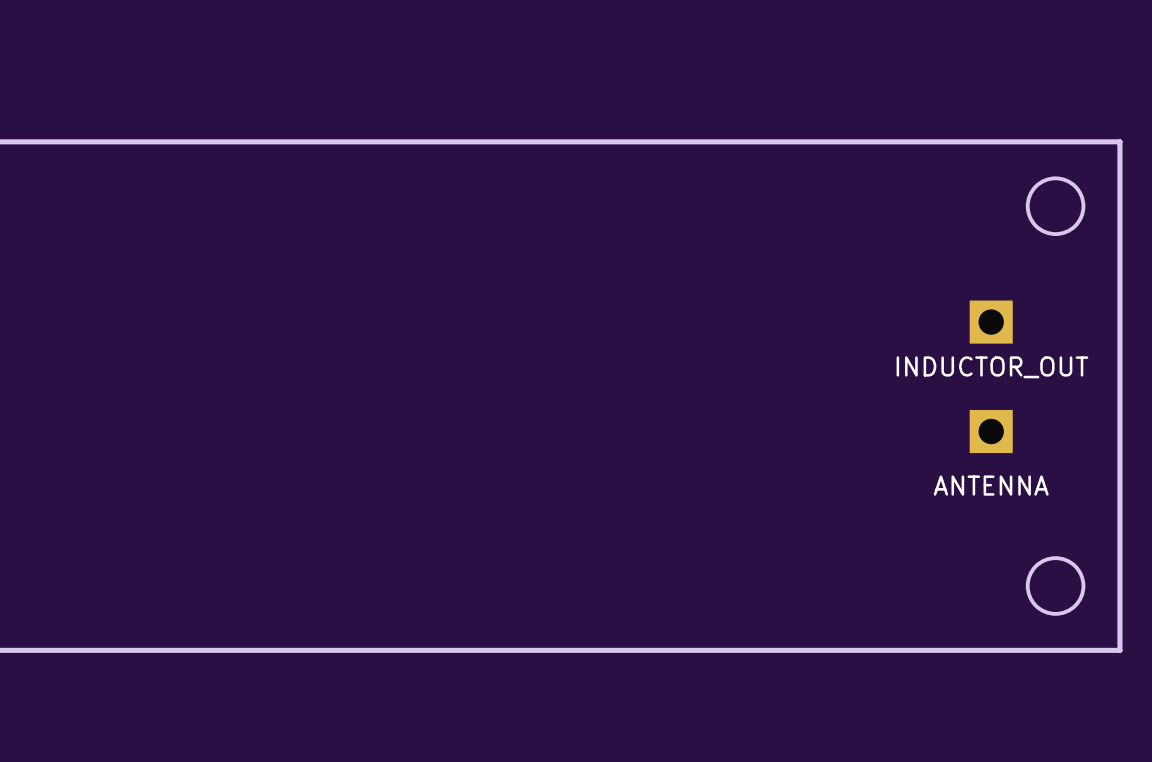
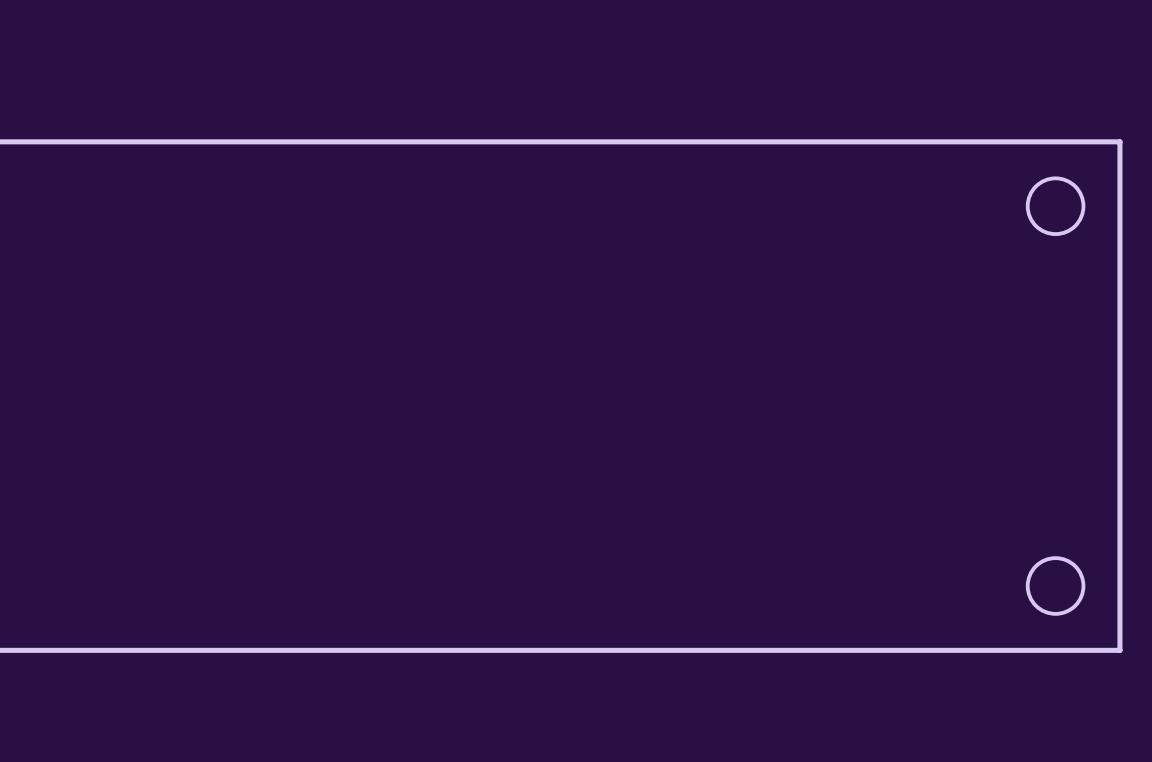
part: (991, 322) -> none
text: INDUCTOR_OUT (992, 367) -> none
part: (991, 431) -> none
text: ANTENNA (991, 485) -> none

